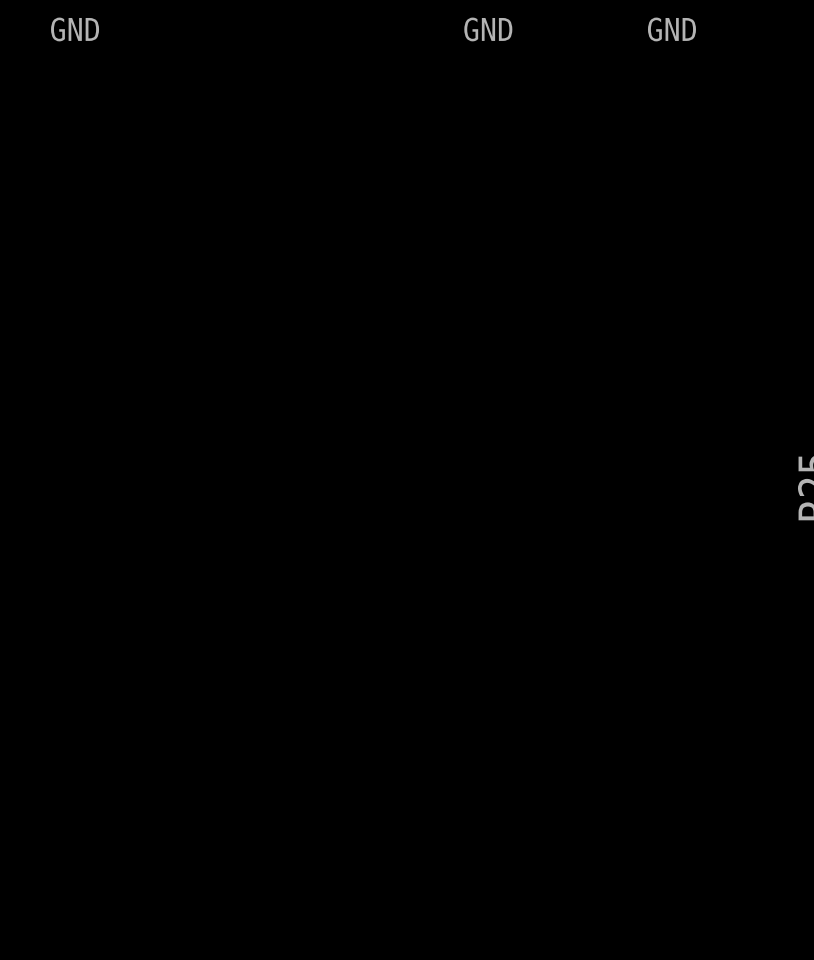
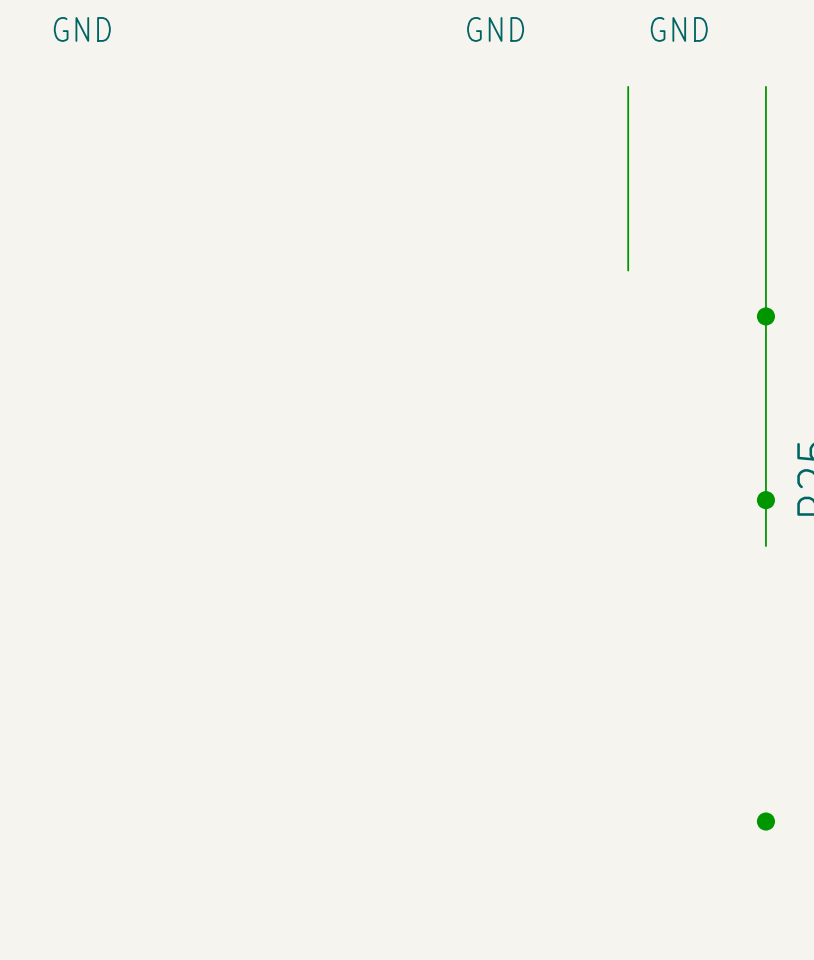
wire: none -> (628, 86) (628, 270)
wire: none -> (765, 86) (765, 546)
junction: none -> (765, 316)
junction: none -> (765, 500)
junction: none -> (765, 821)

